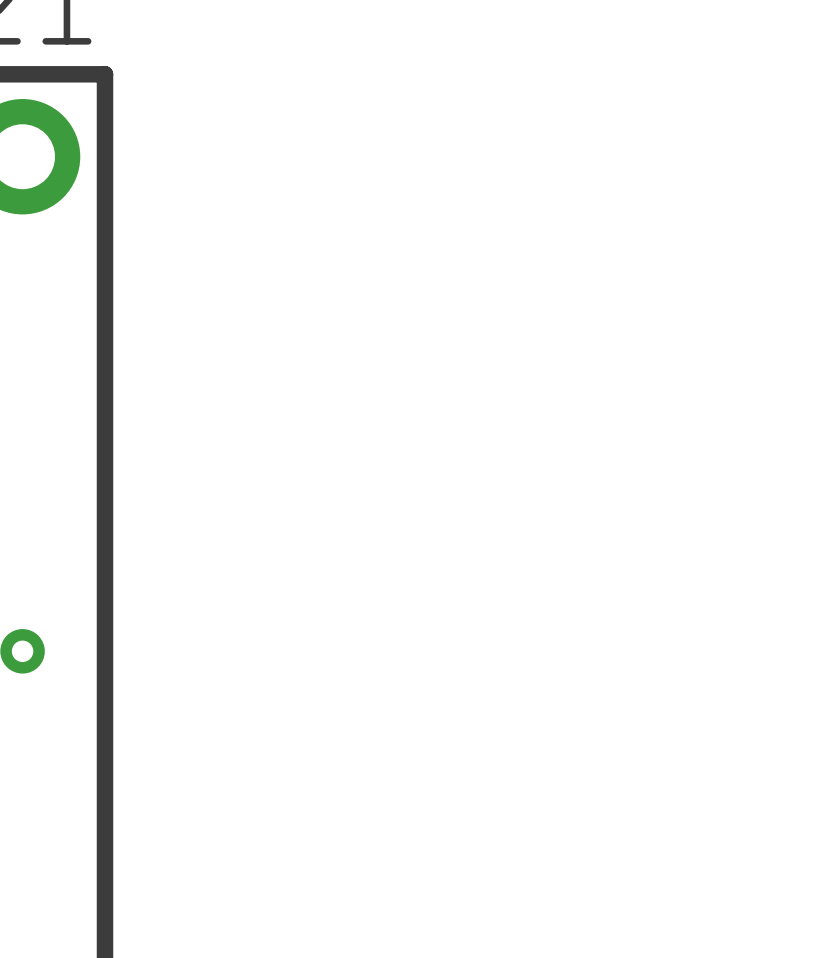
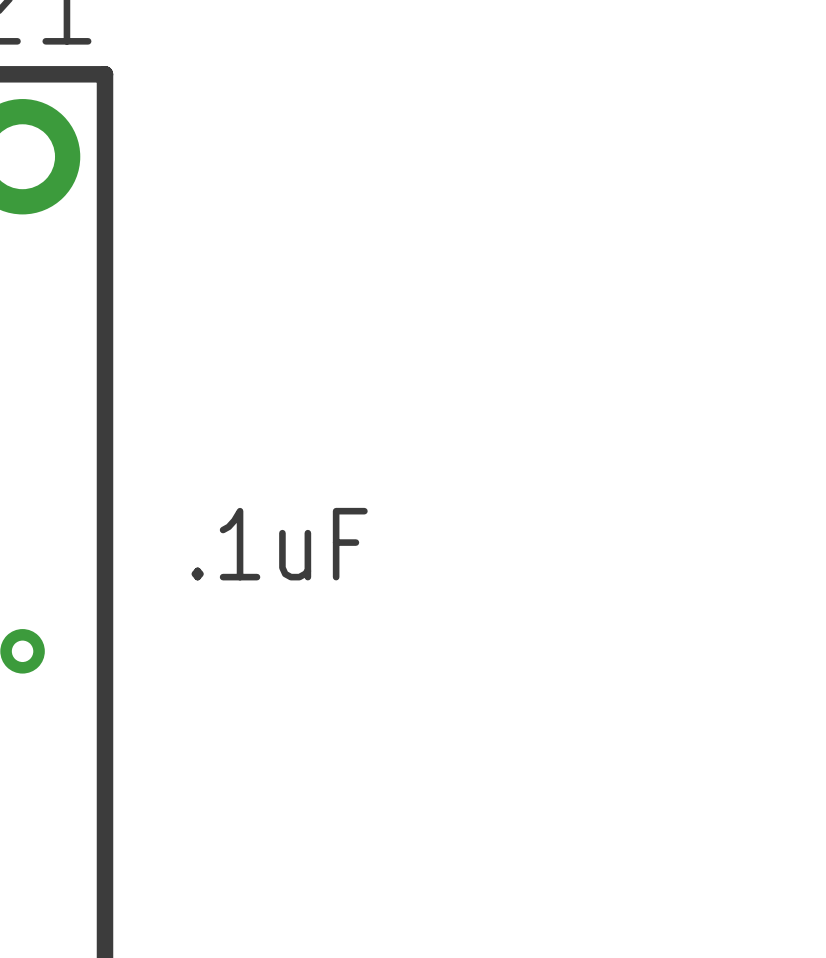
text: none -> .1uF (279, 544)

